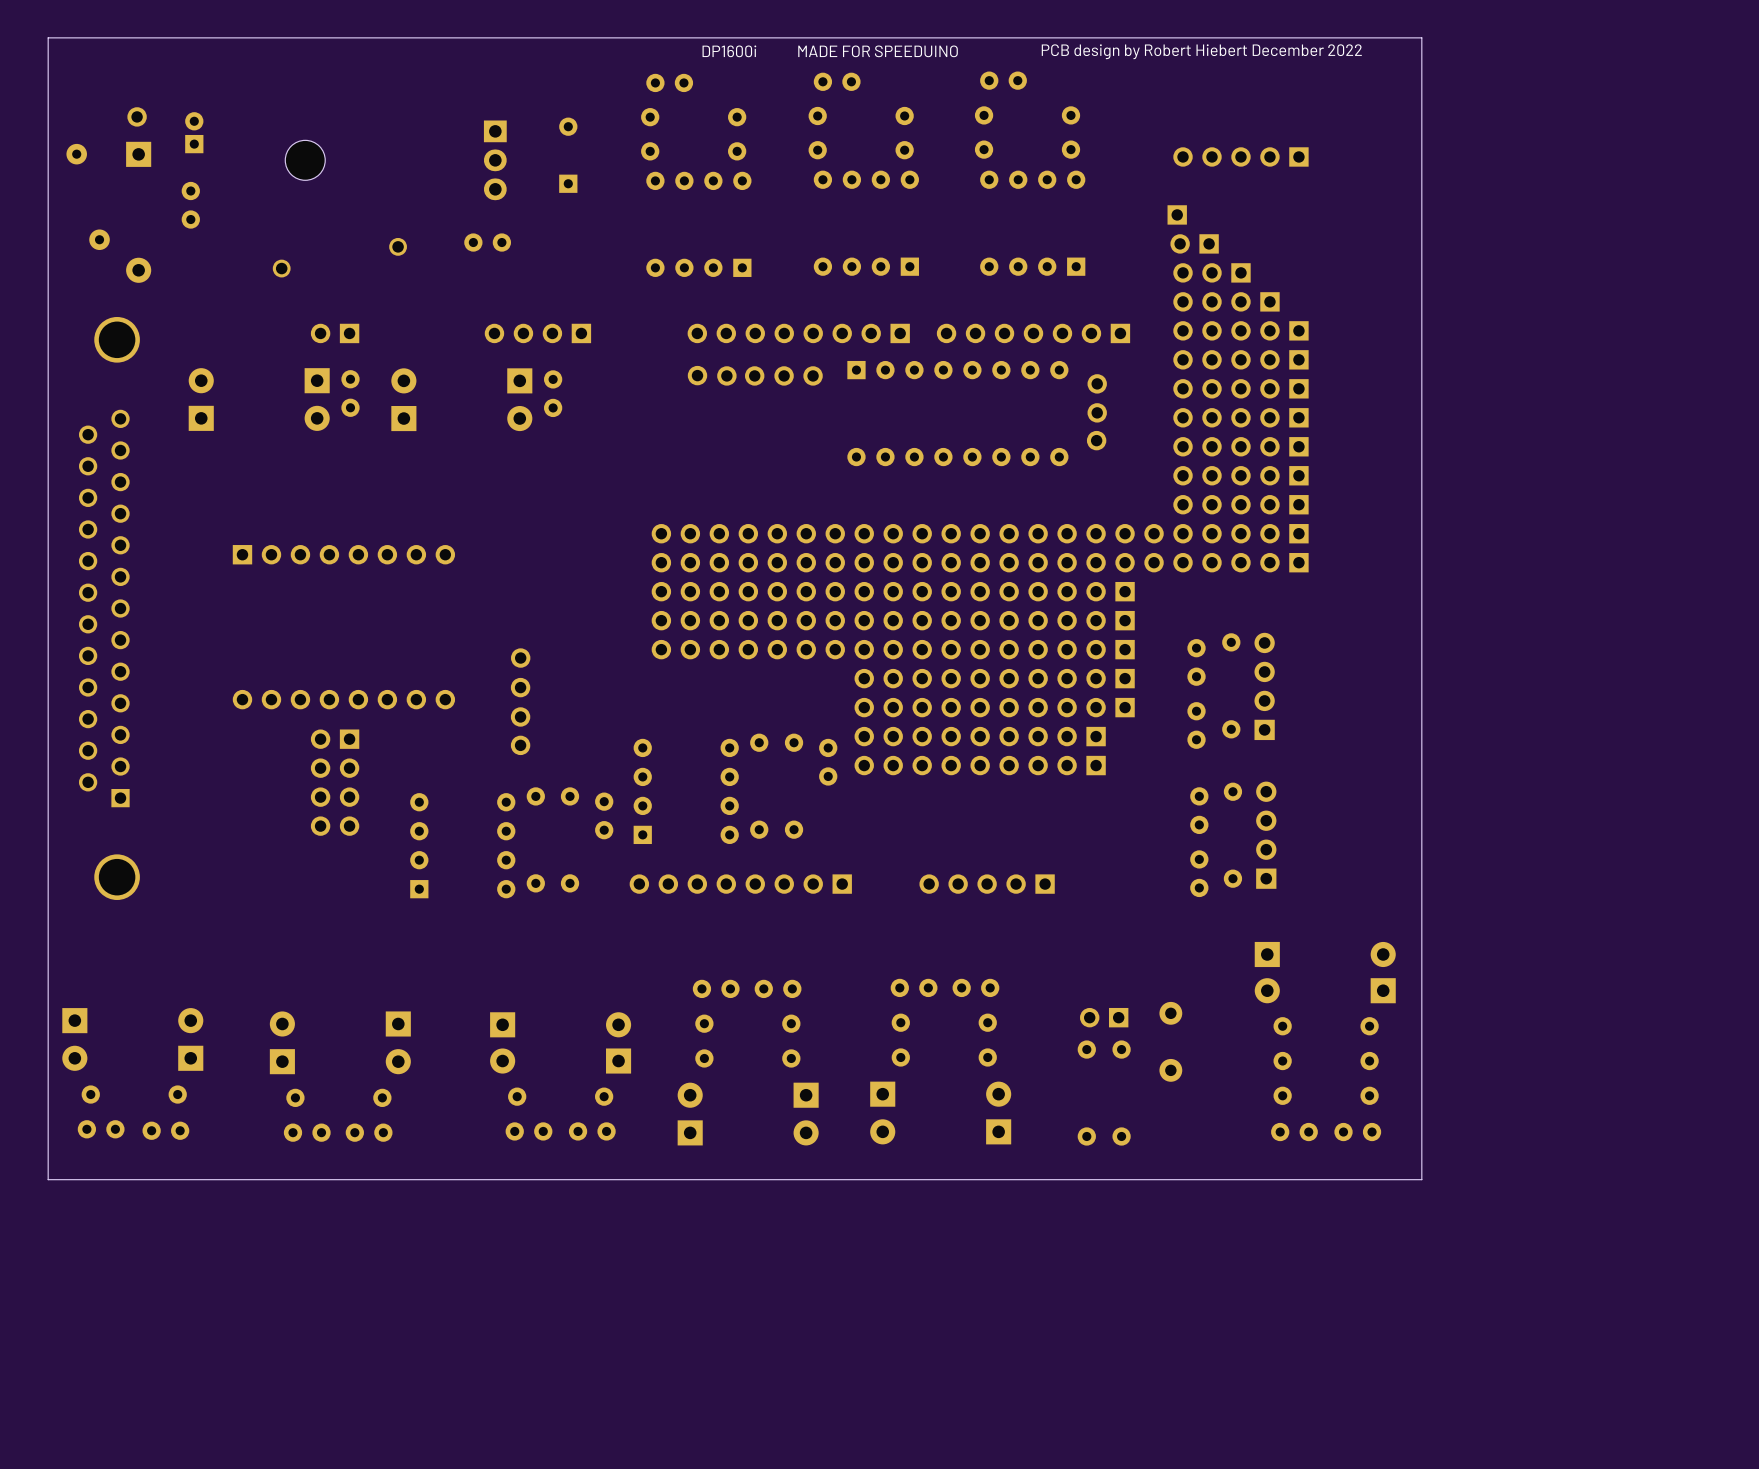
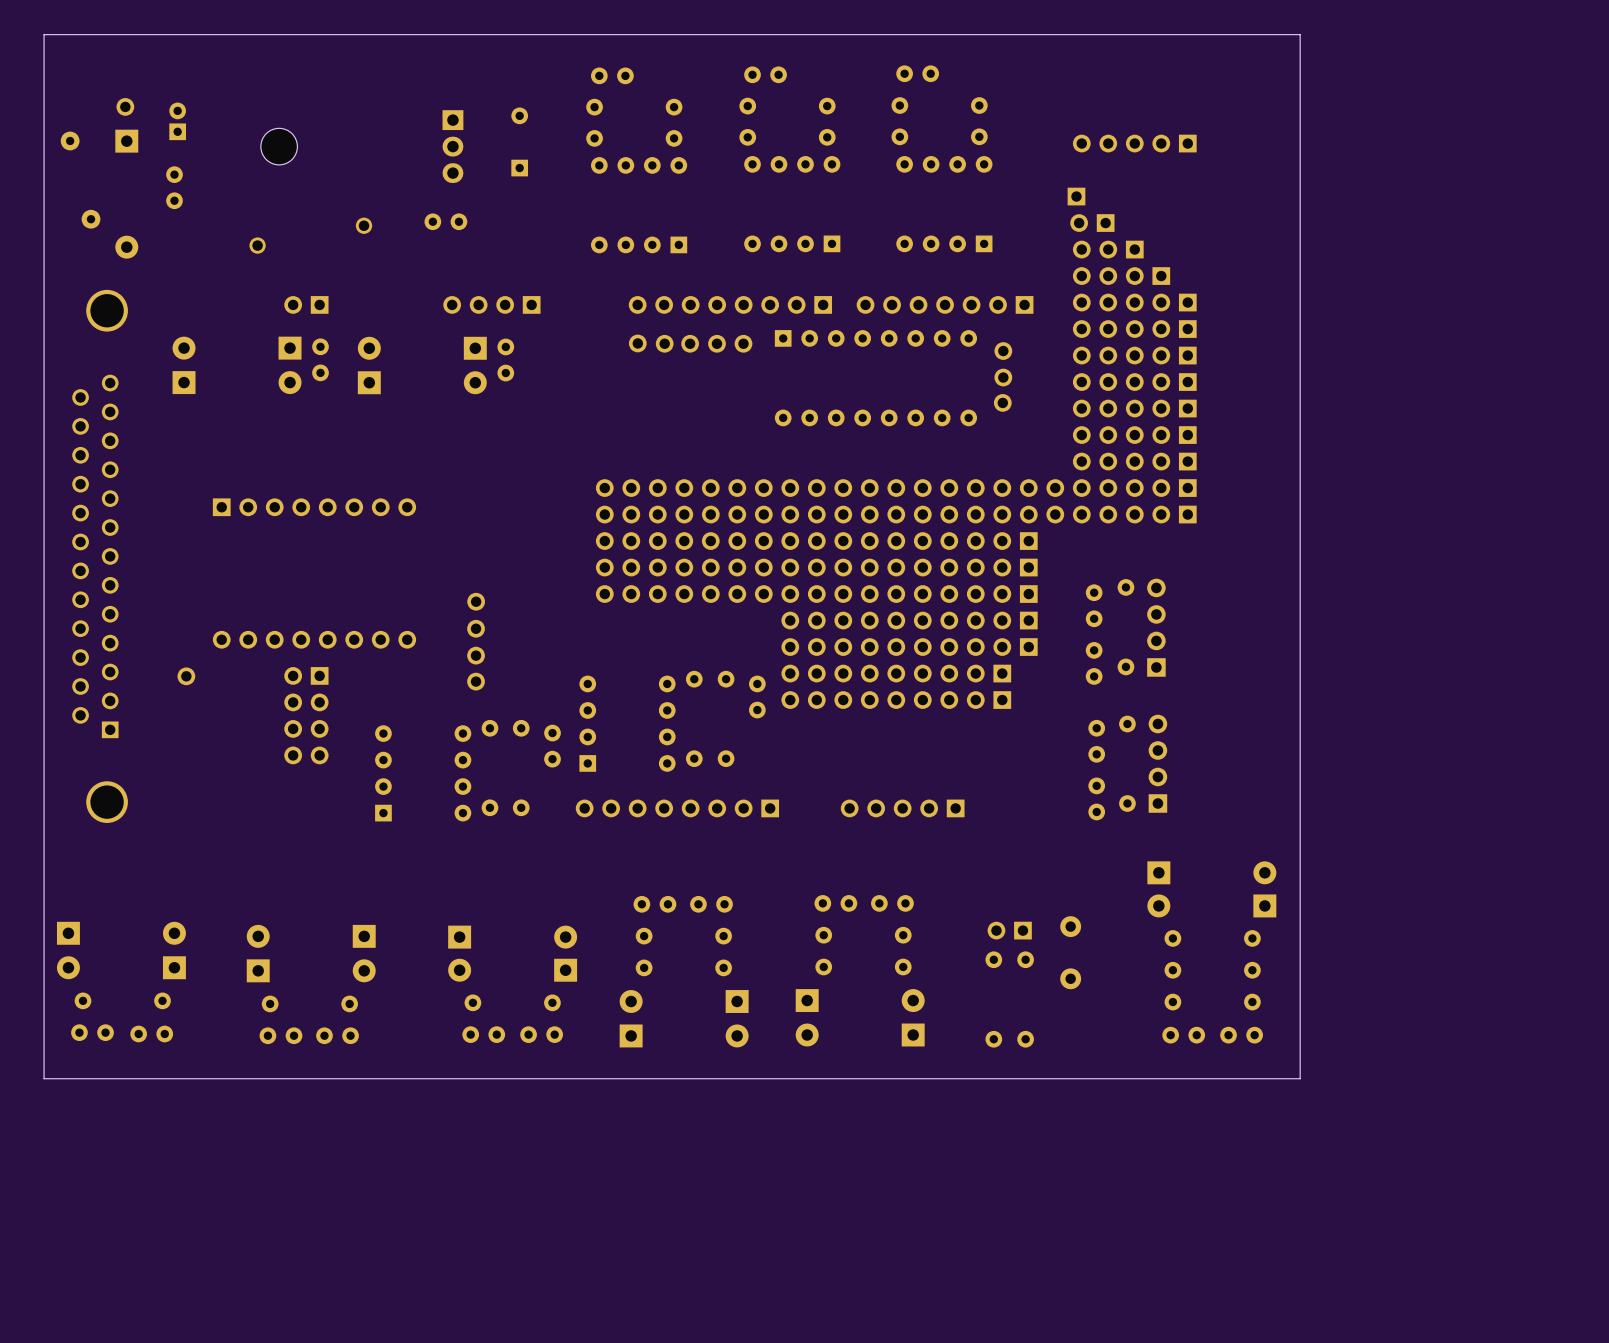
text: DP1600i (729, 51) -> none
text: MADE FOR SPEEDUINO (878, 51) -> none
text: PCB design by Robert Hiebert December 2022 (1201, 51) -> none
part: none -> (186, 676)

